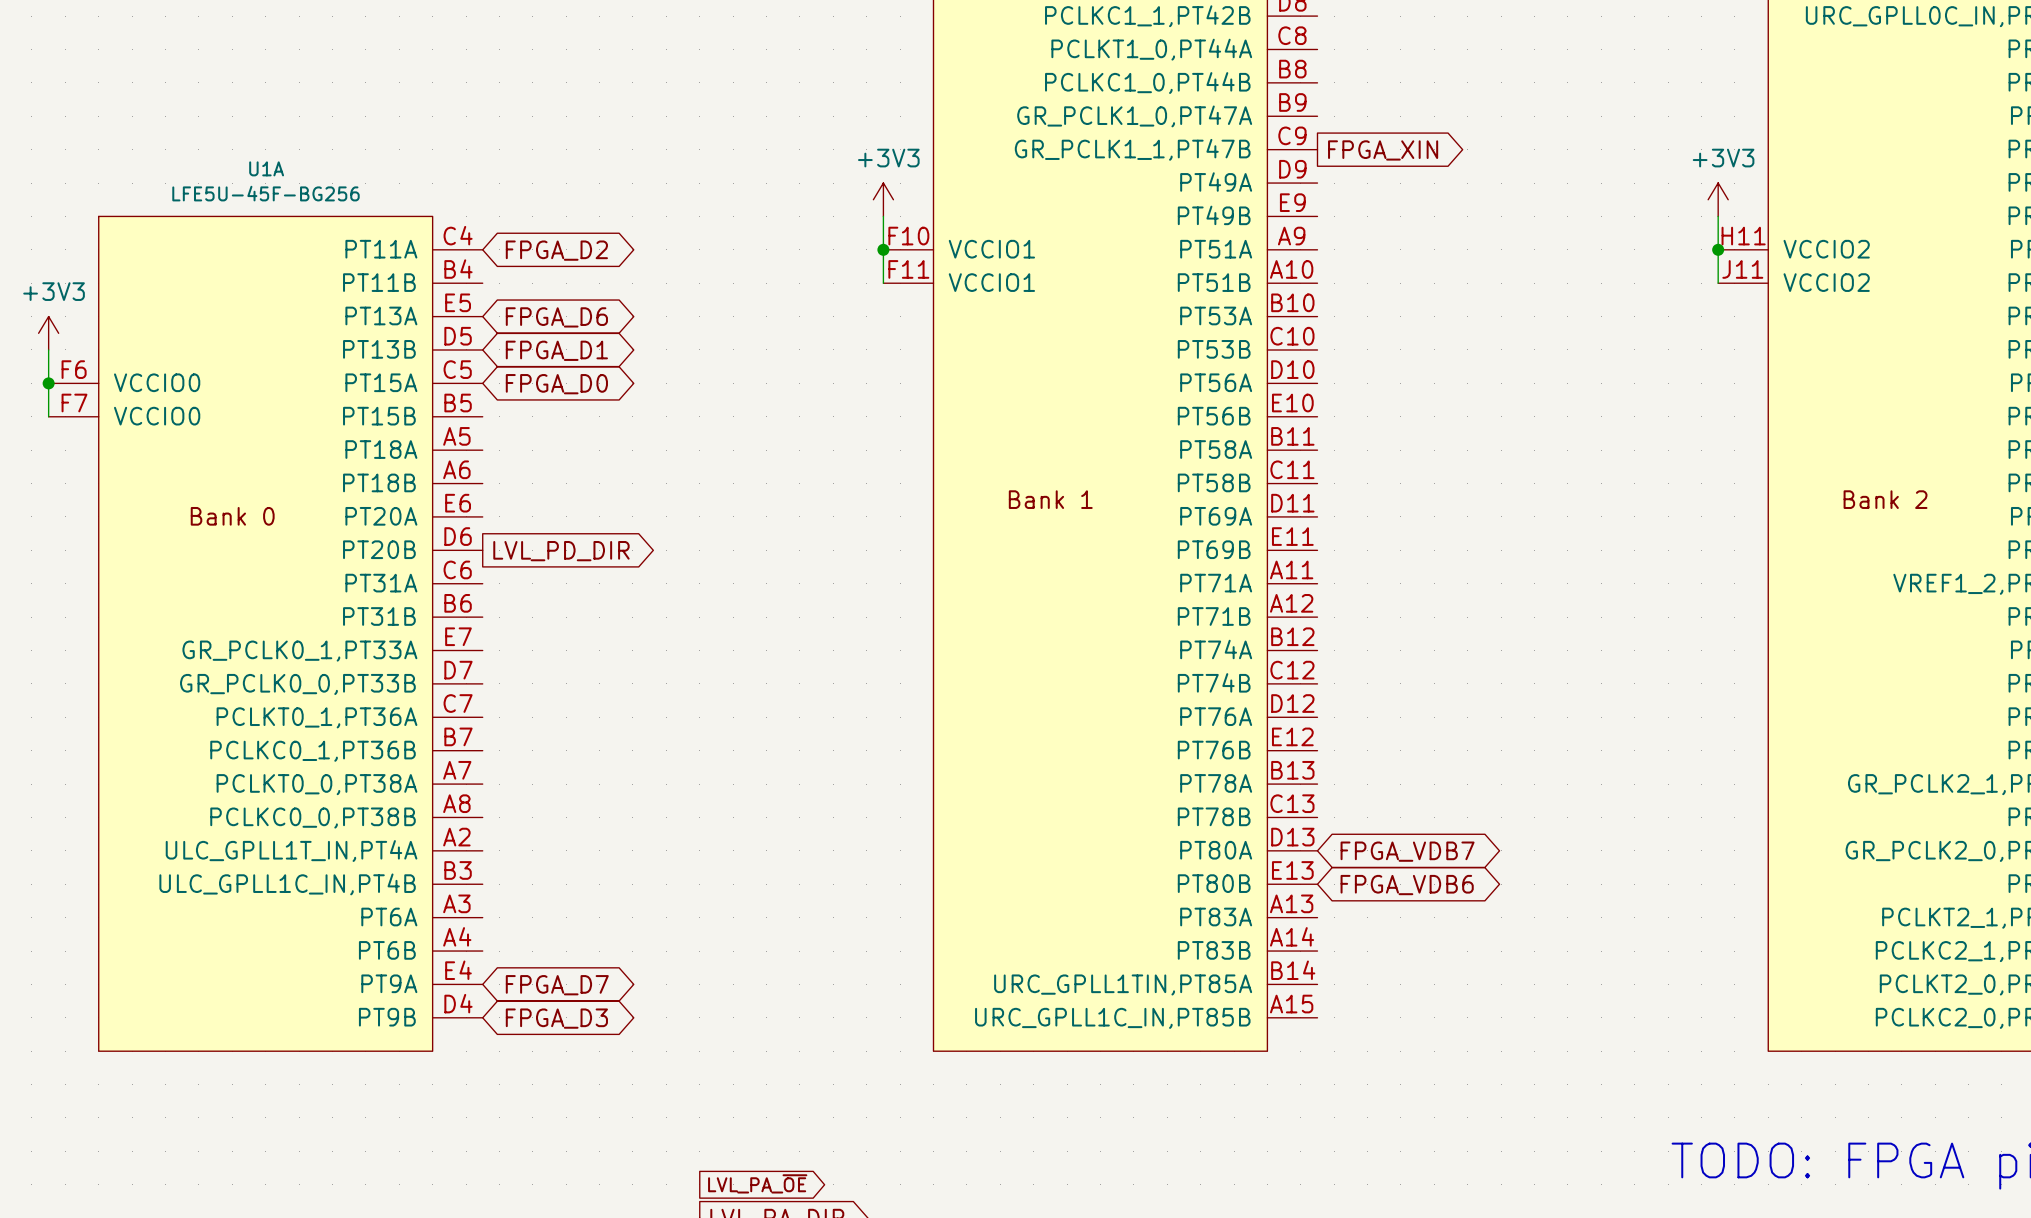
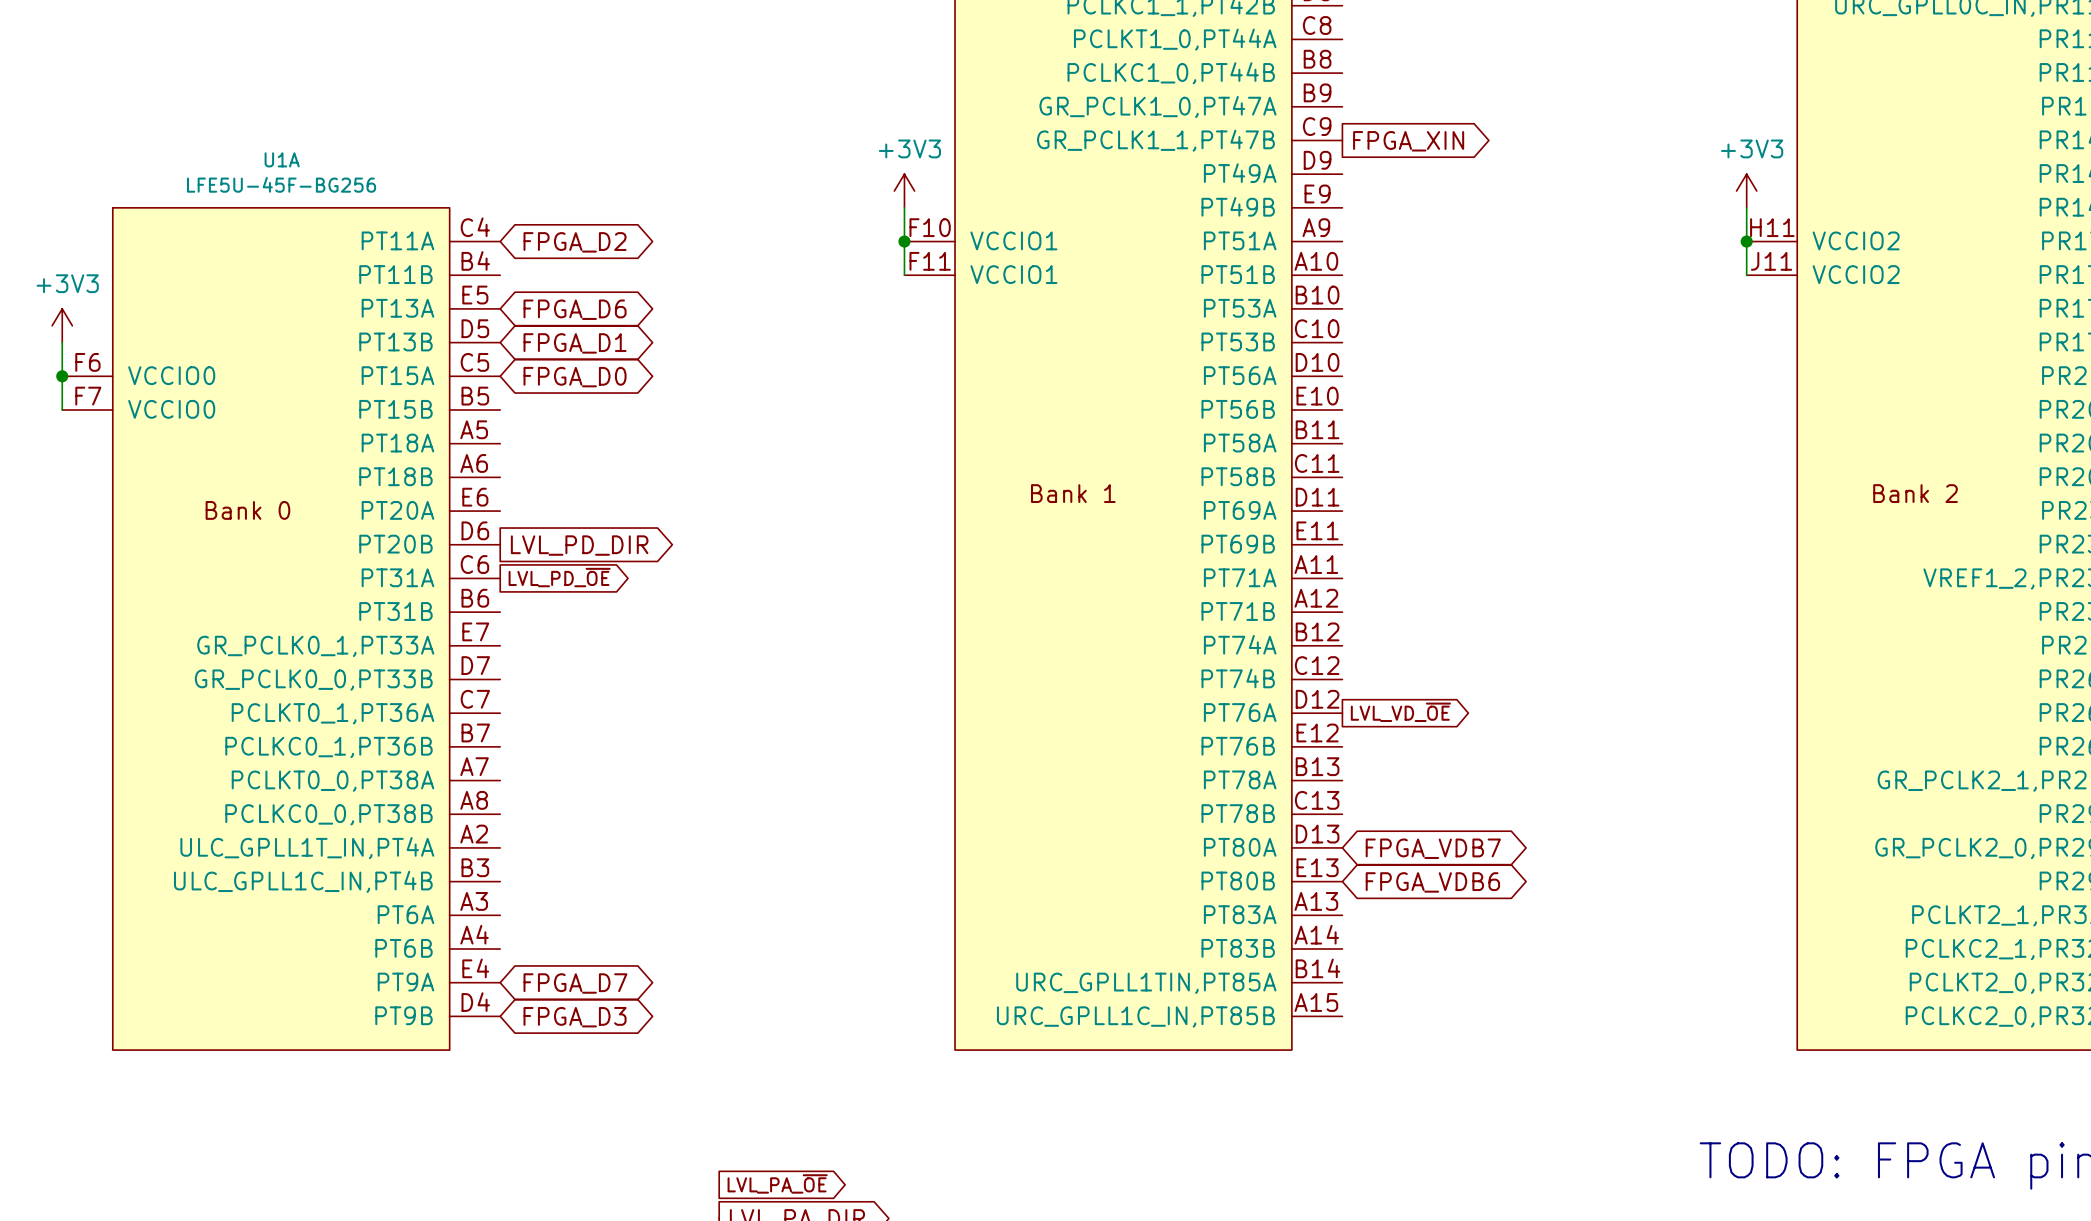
global label: none -> LVL_PD_~{OE} (559, 577)
global label: none -> LVL_VD_~{OE} (1400, 712)

